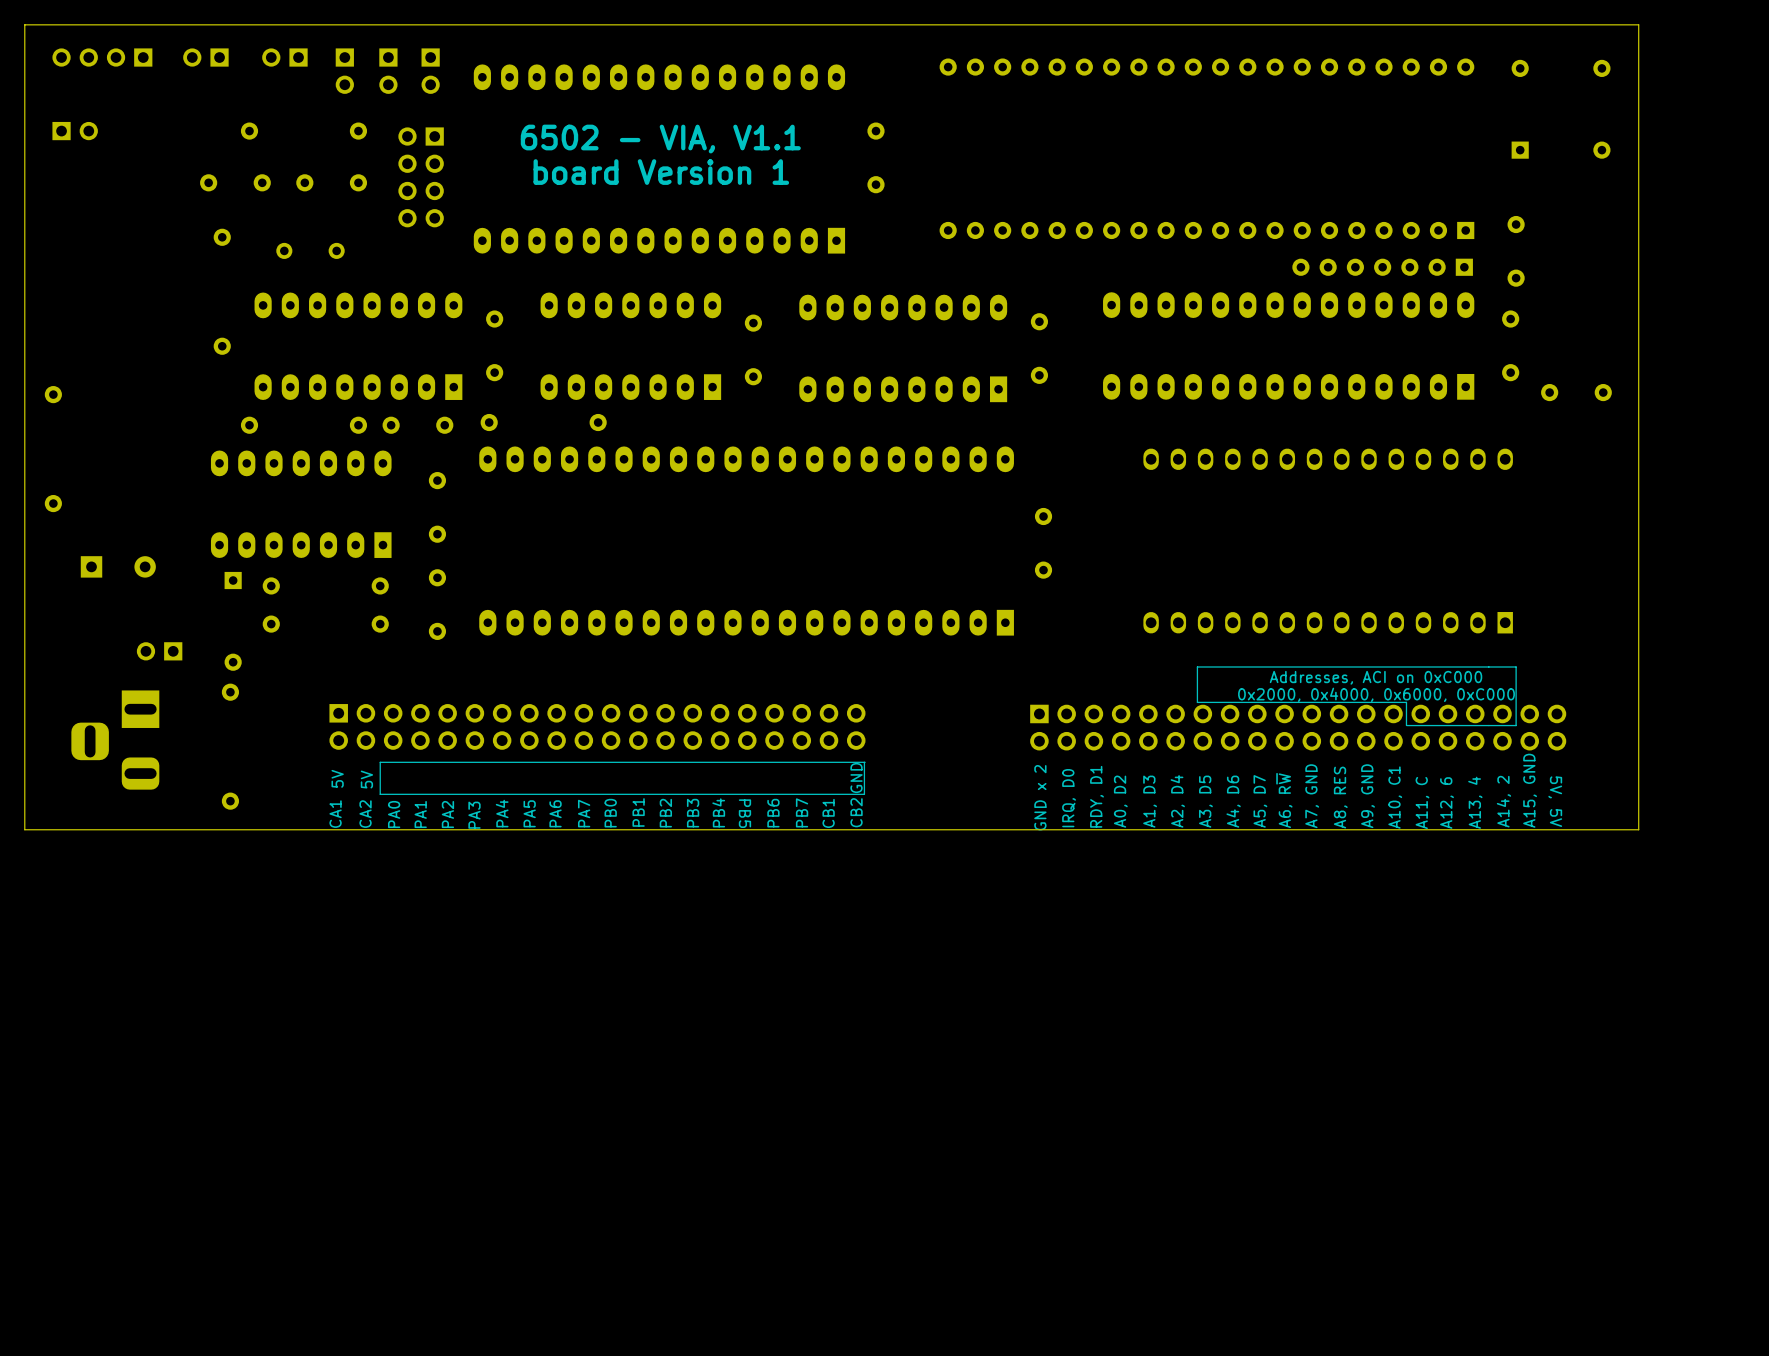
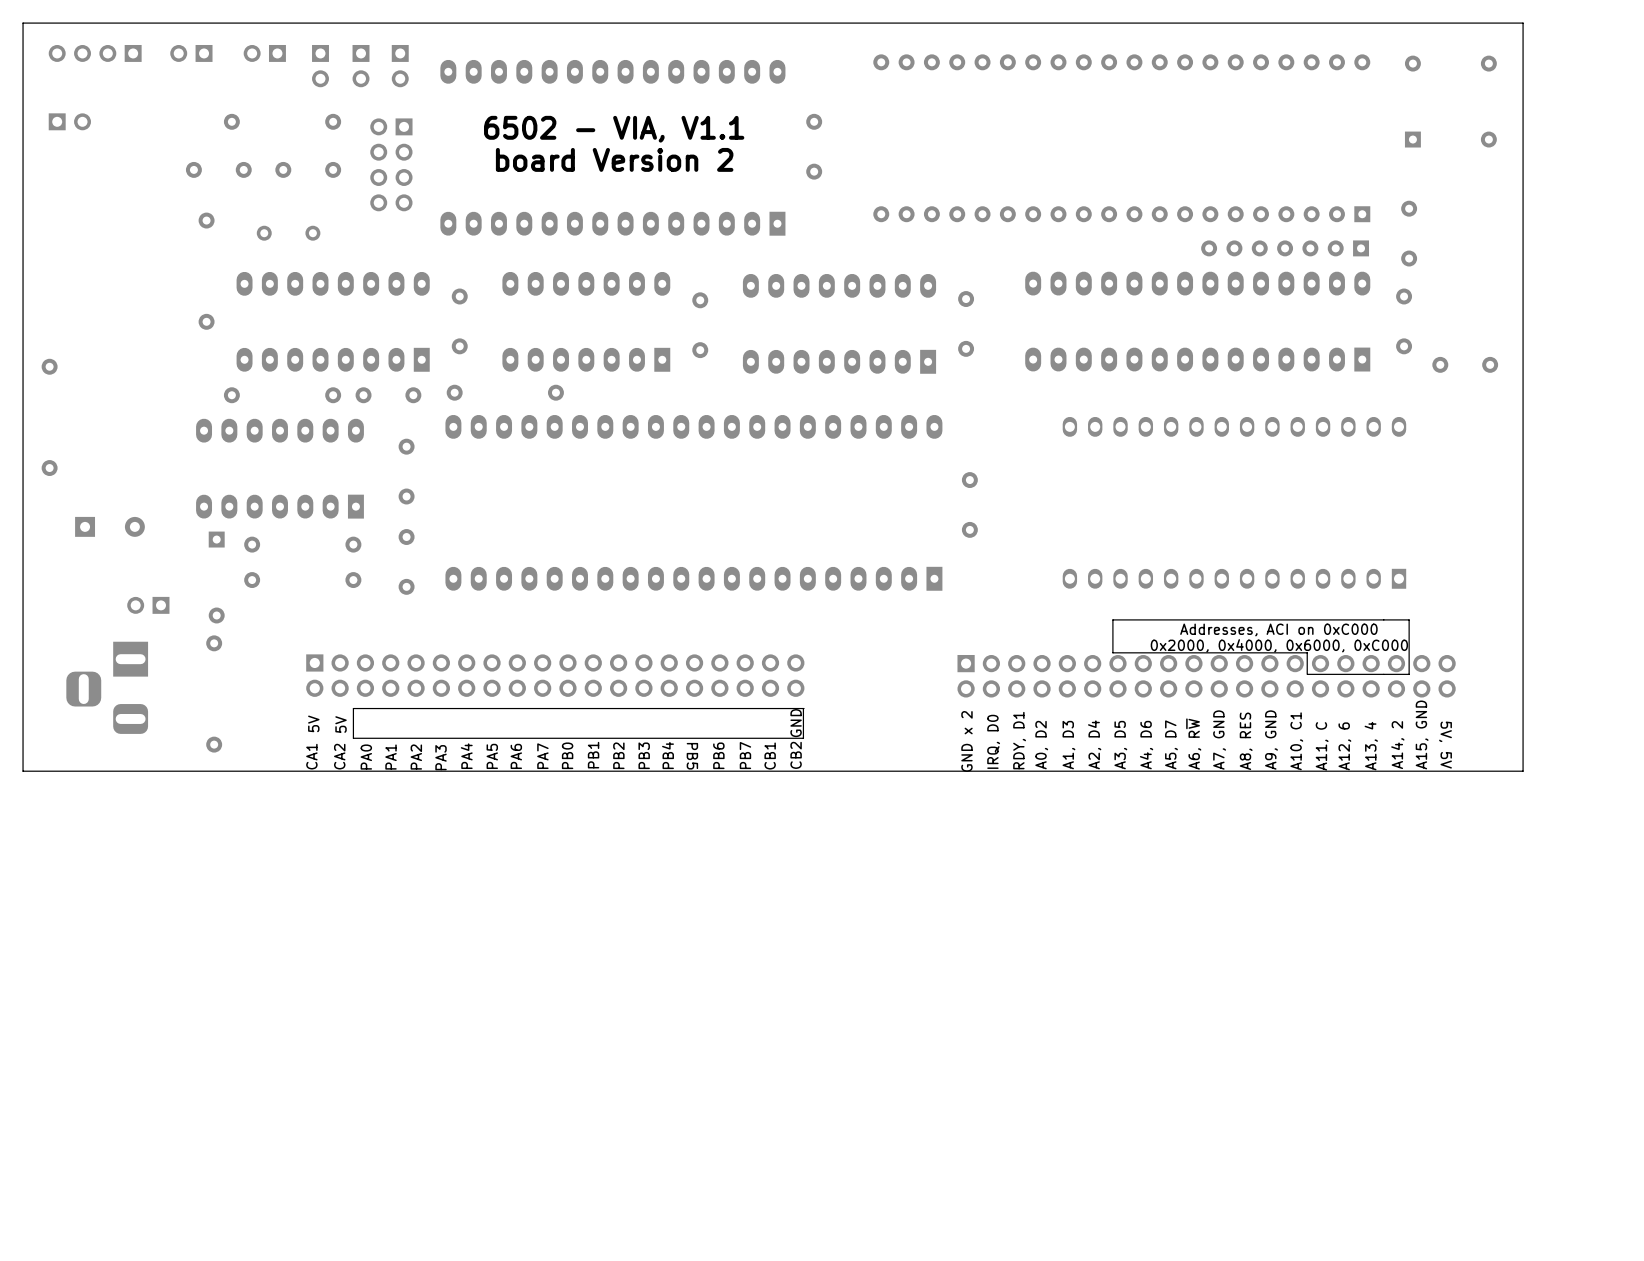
text: board Version 1 (661, 172) -> board Version 2 (614, 159)

